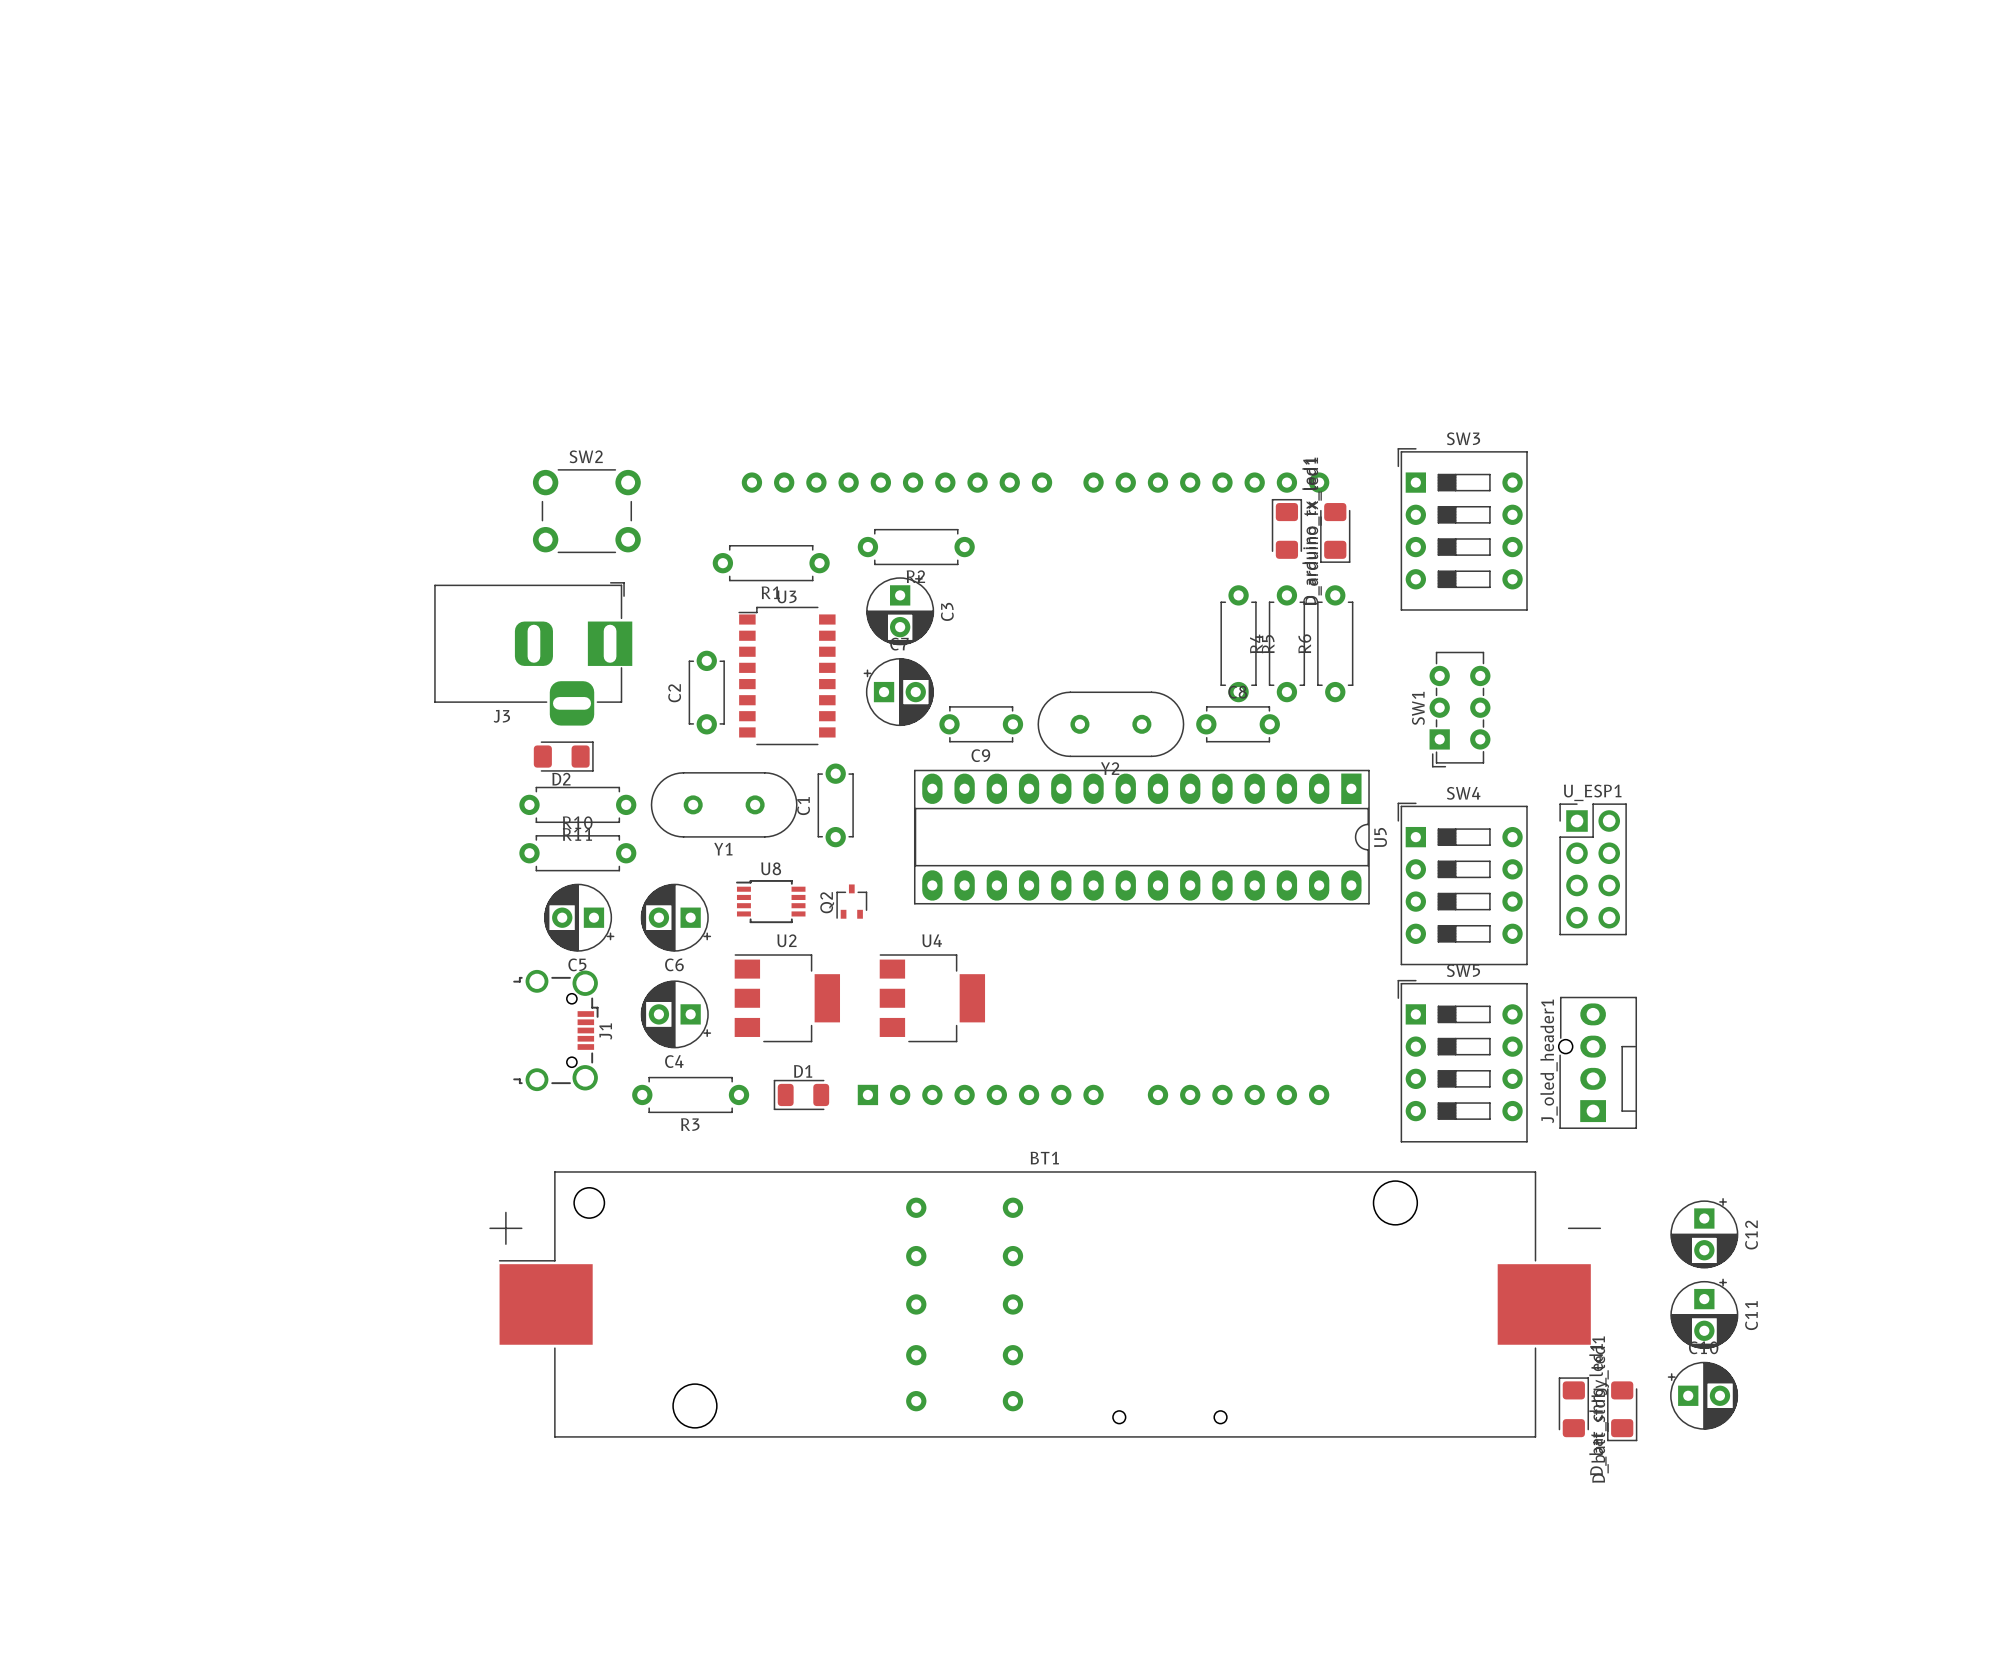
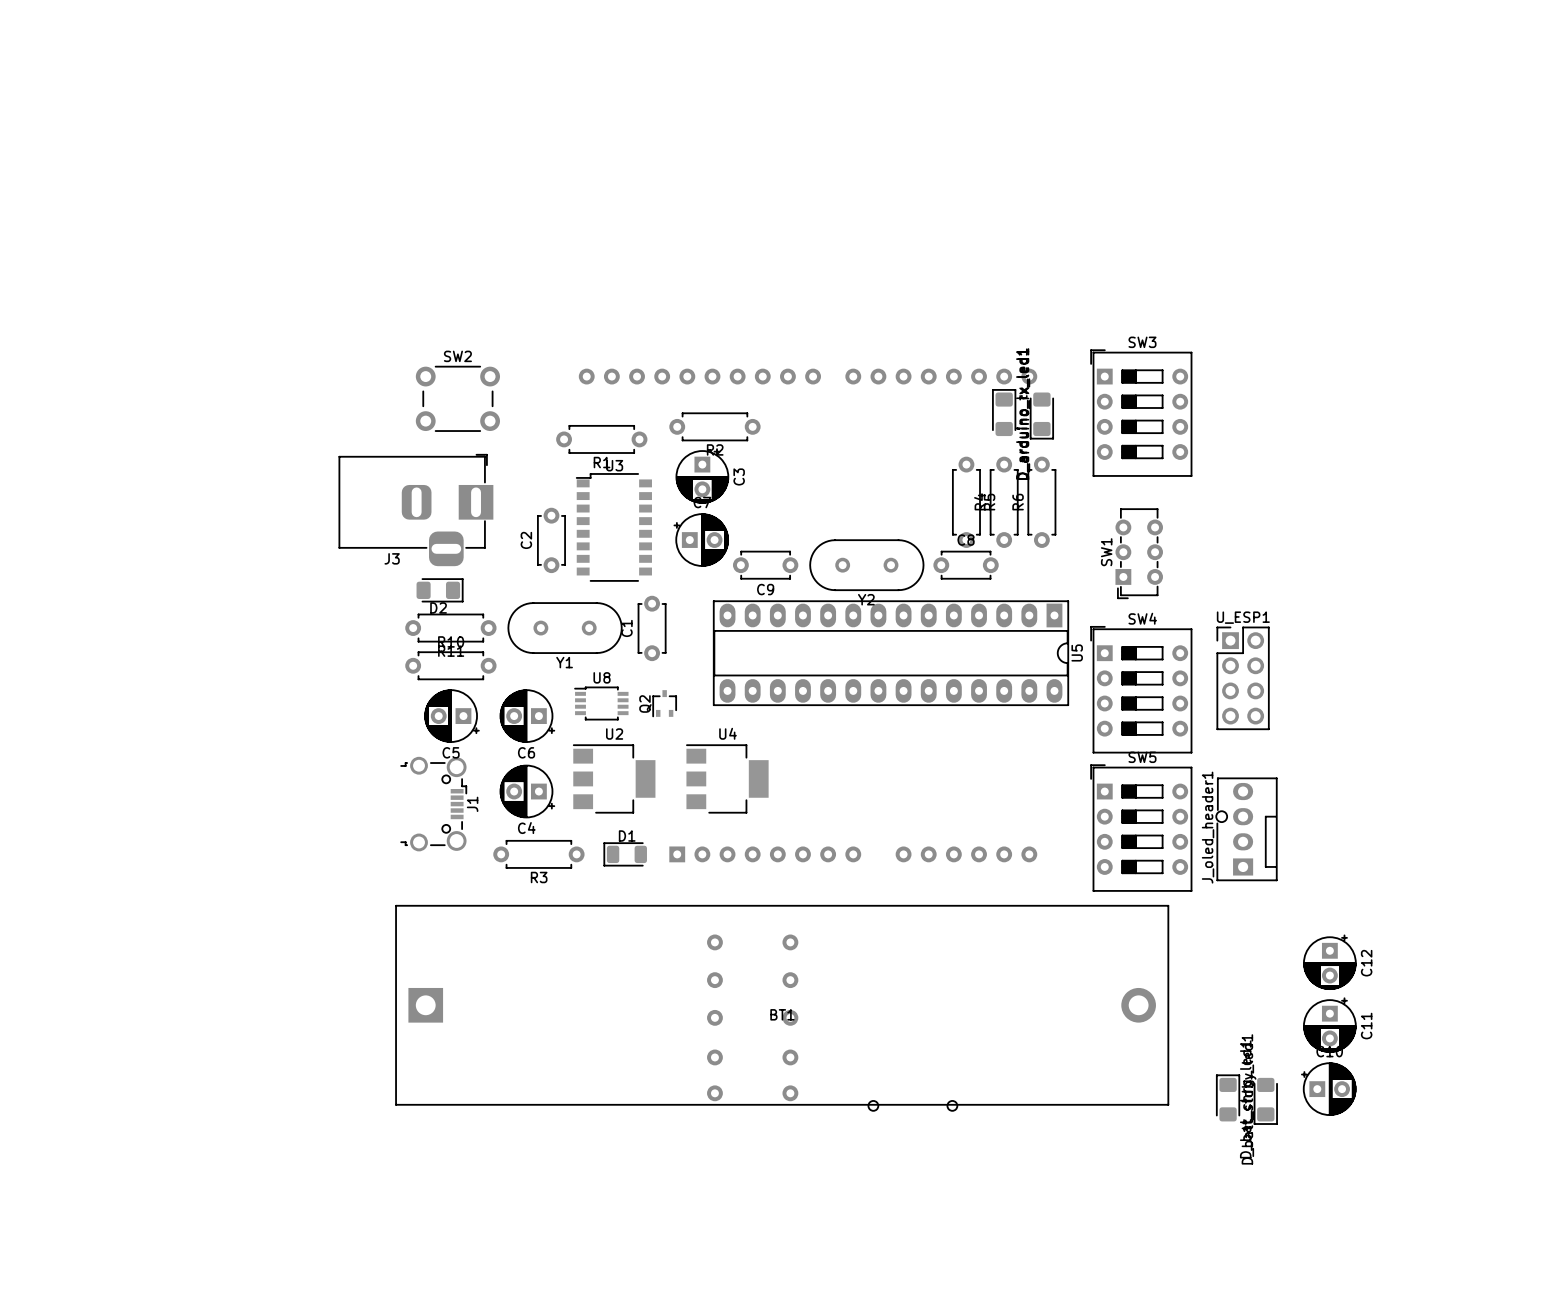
BT1 name position: BT1 (1044, 1158) -> BT1 (782, 1014)
BT1 footprint: [489, 1171, 1602, 1438] -> [395, 905, 1170, 1106]

